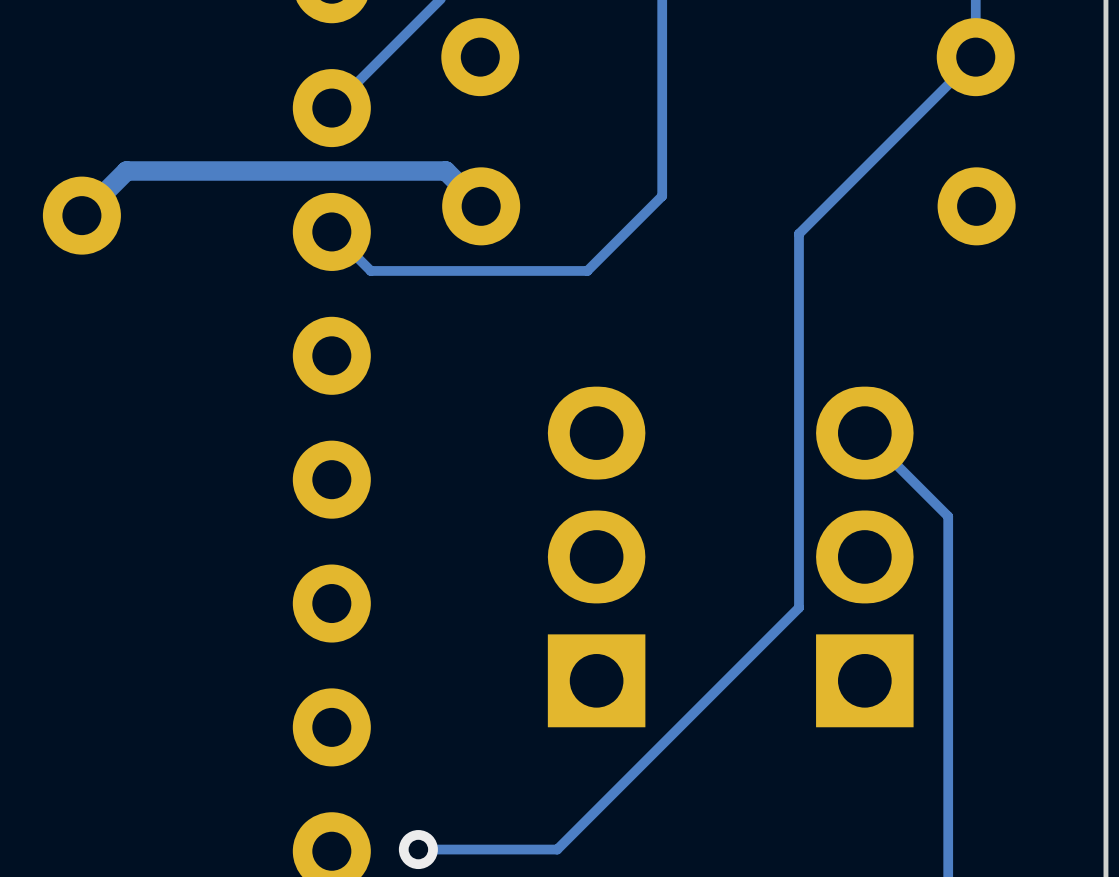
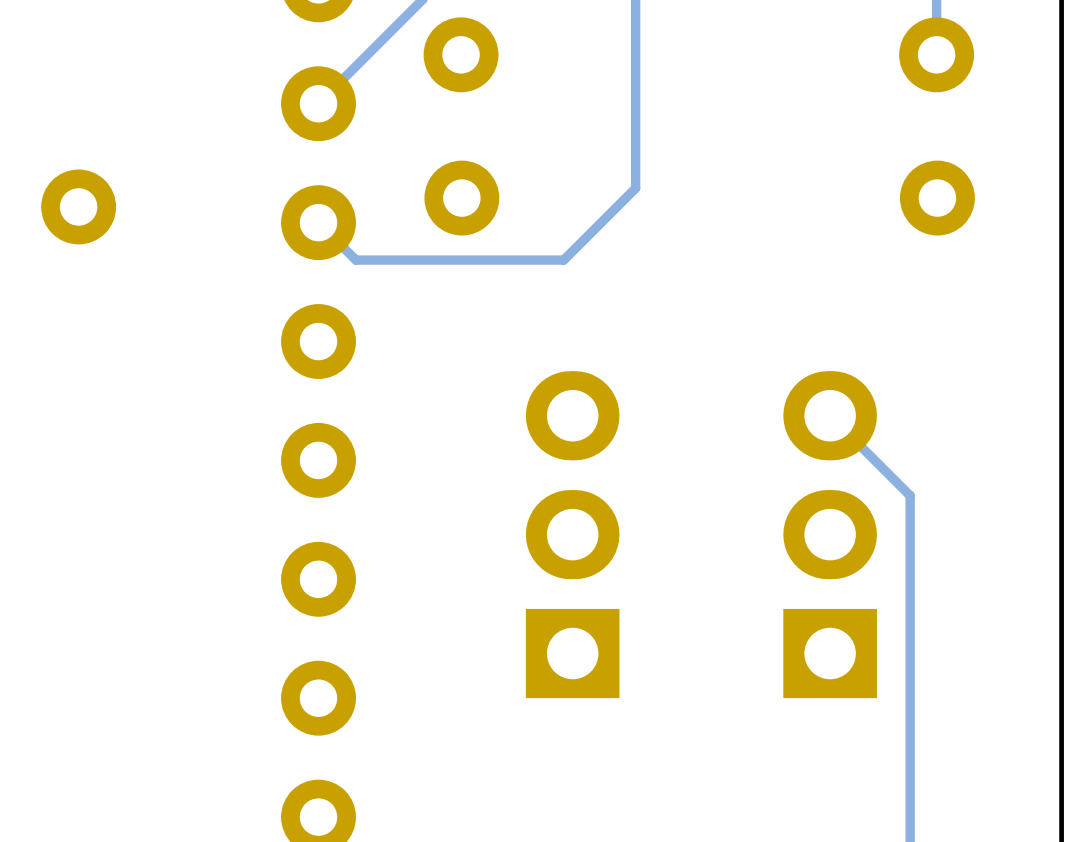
track: (975, 57) (798, 233) (798, 607) (557, 849) (418, 849) -> none
track: (481, 206) (445, 170) (126, 170) (81, 215) -> none
via: (418, 849) -> none

